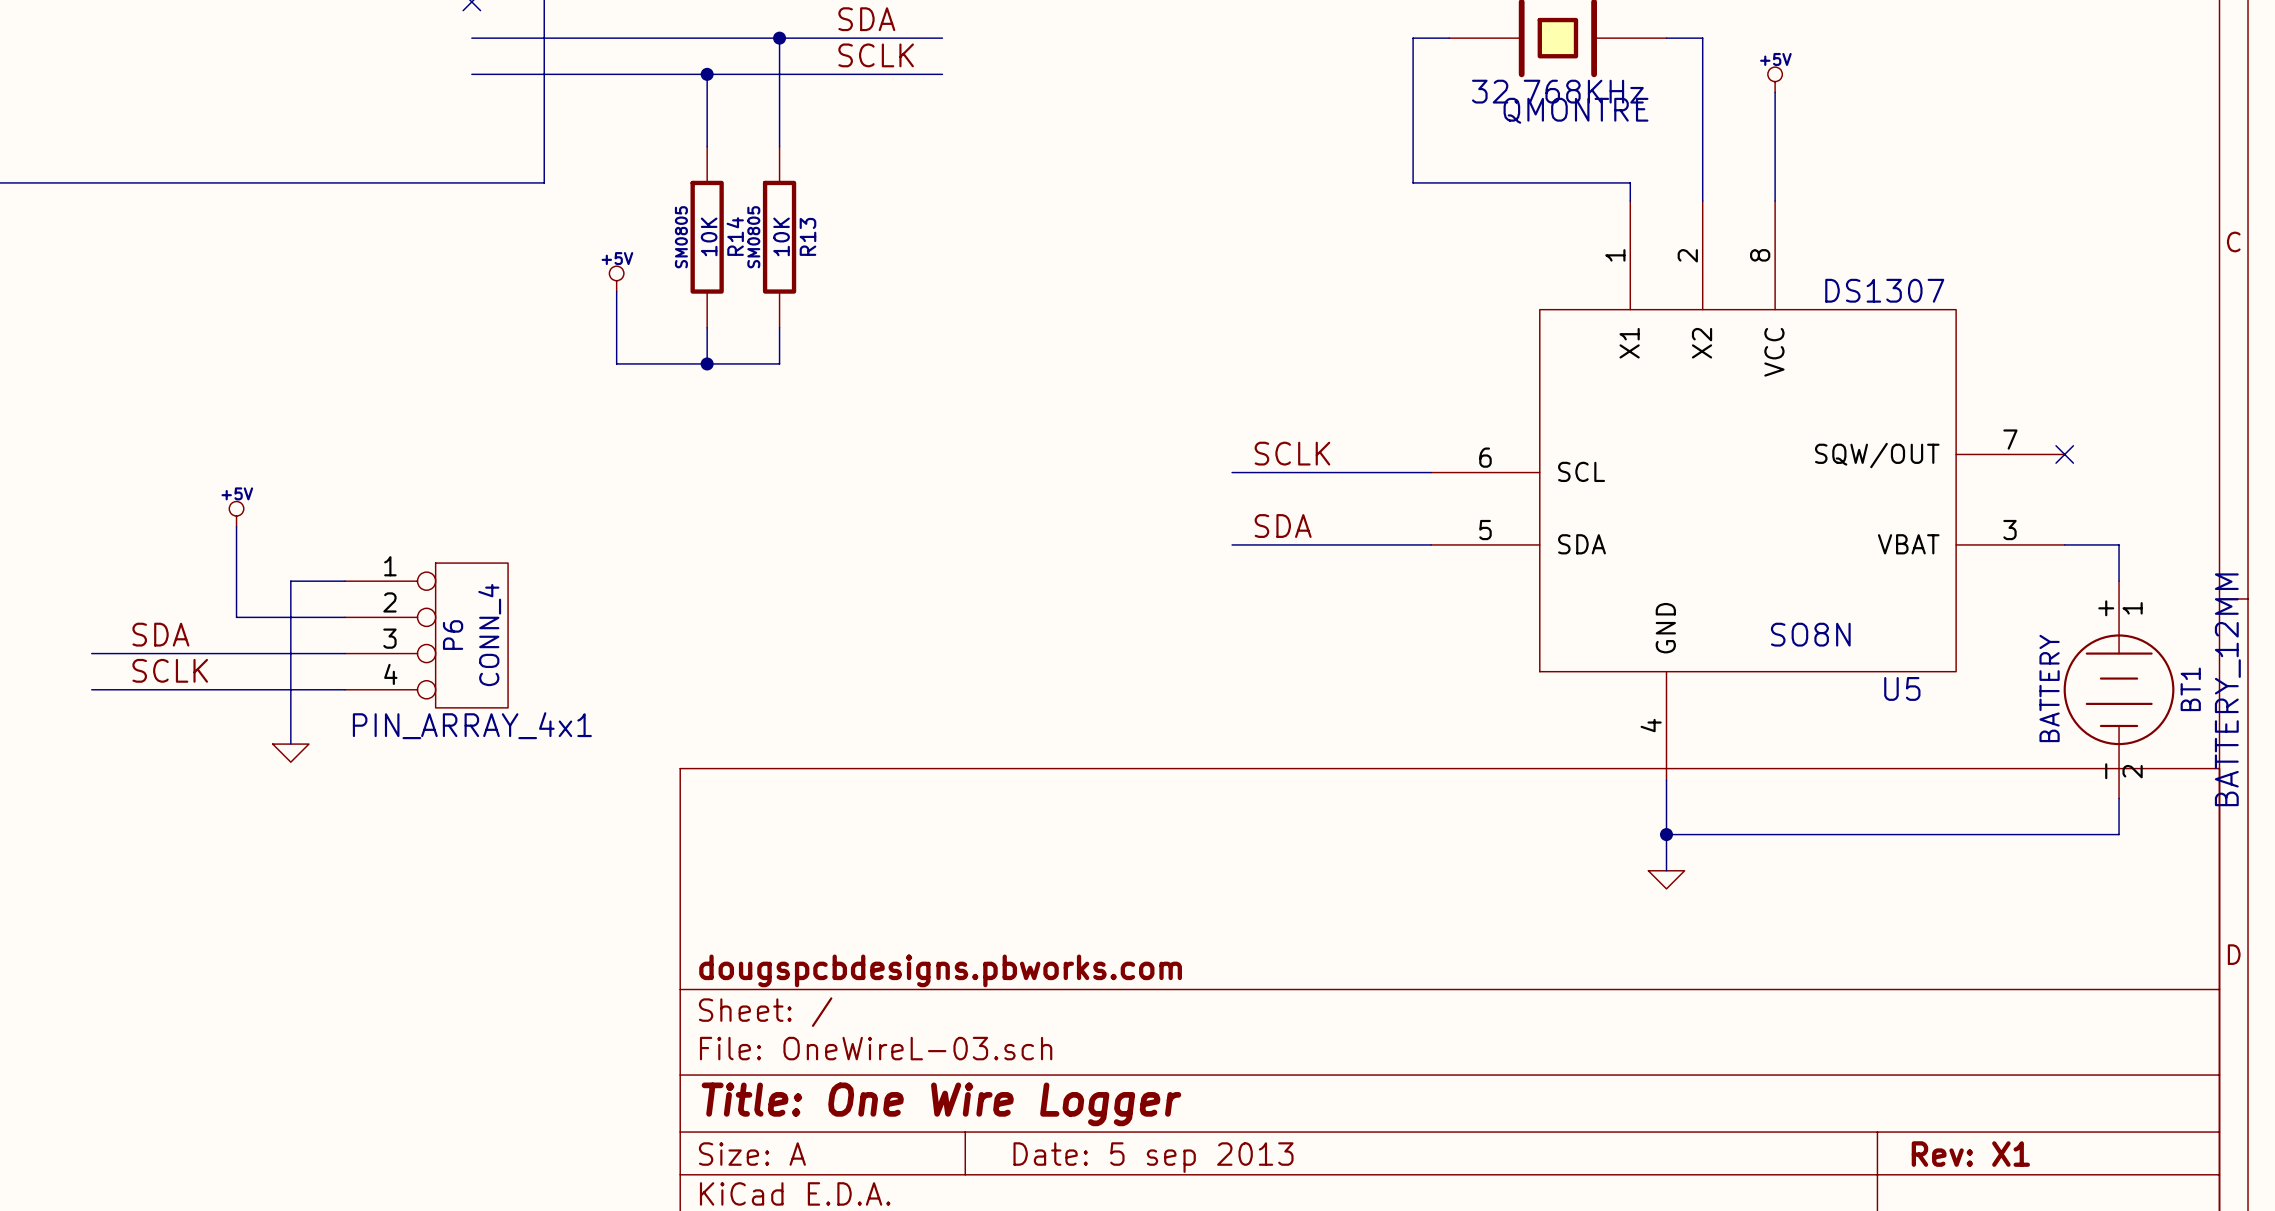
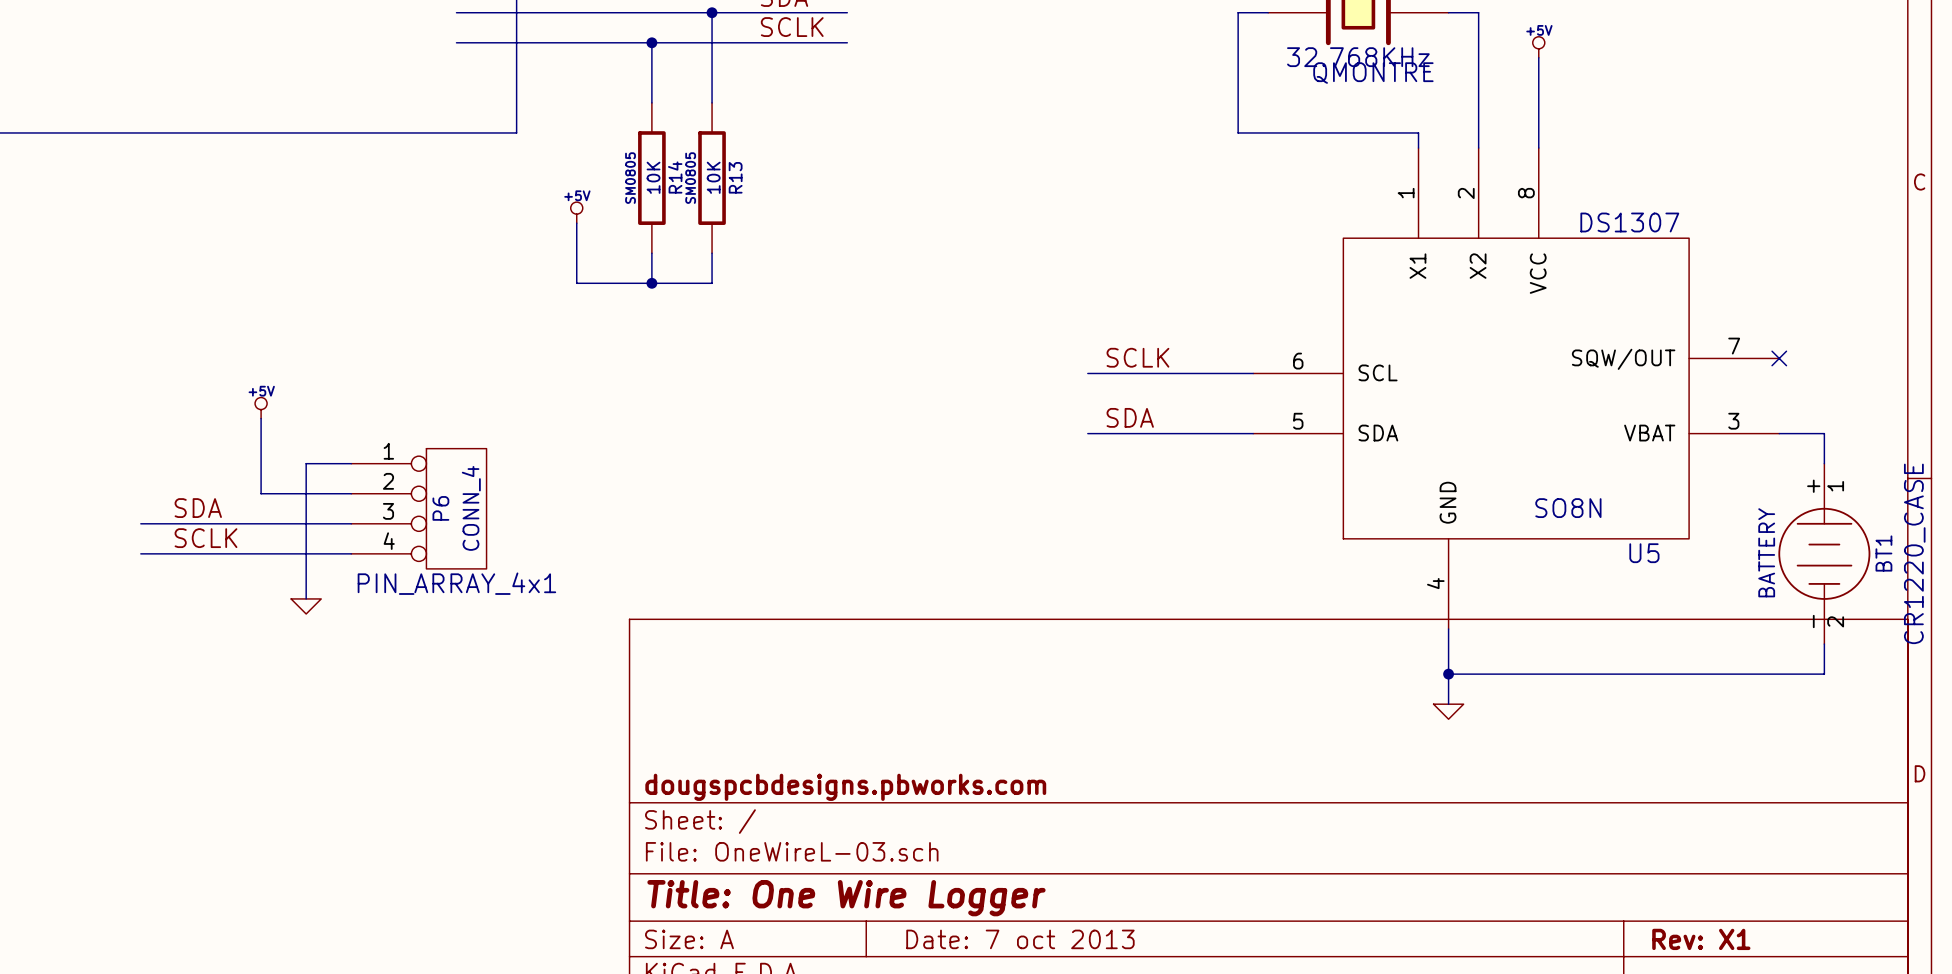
BT1 text: BATTERY_12MM (2227, 689) -> CR1220_CASE (1914, 553)
title block: Date: 5 sep 2013 (1153, 1157) -> Date: 7 oct 2013 (1020, 939)

